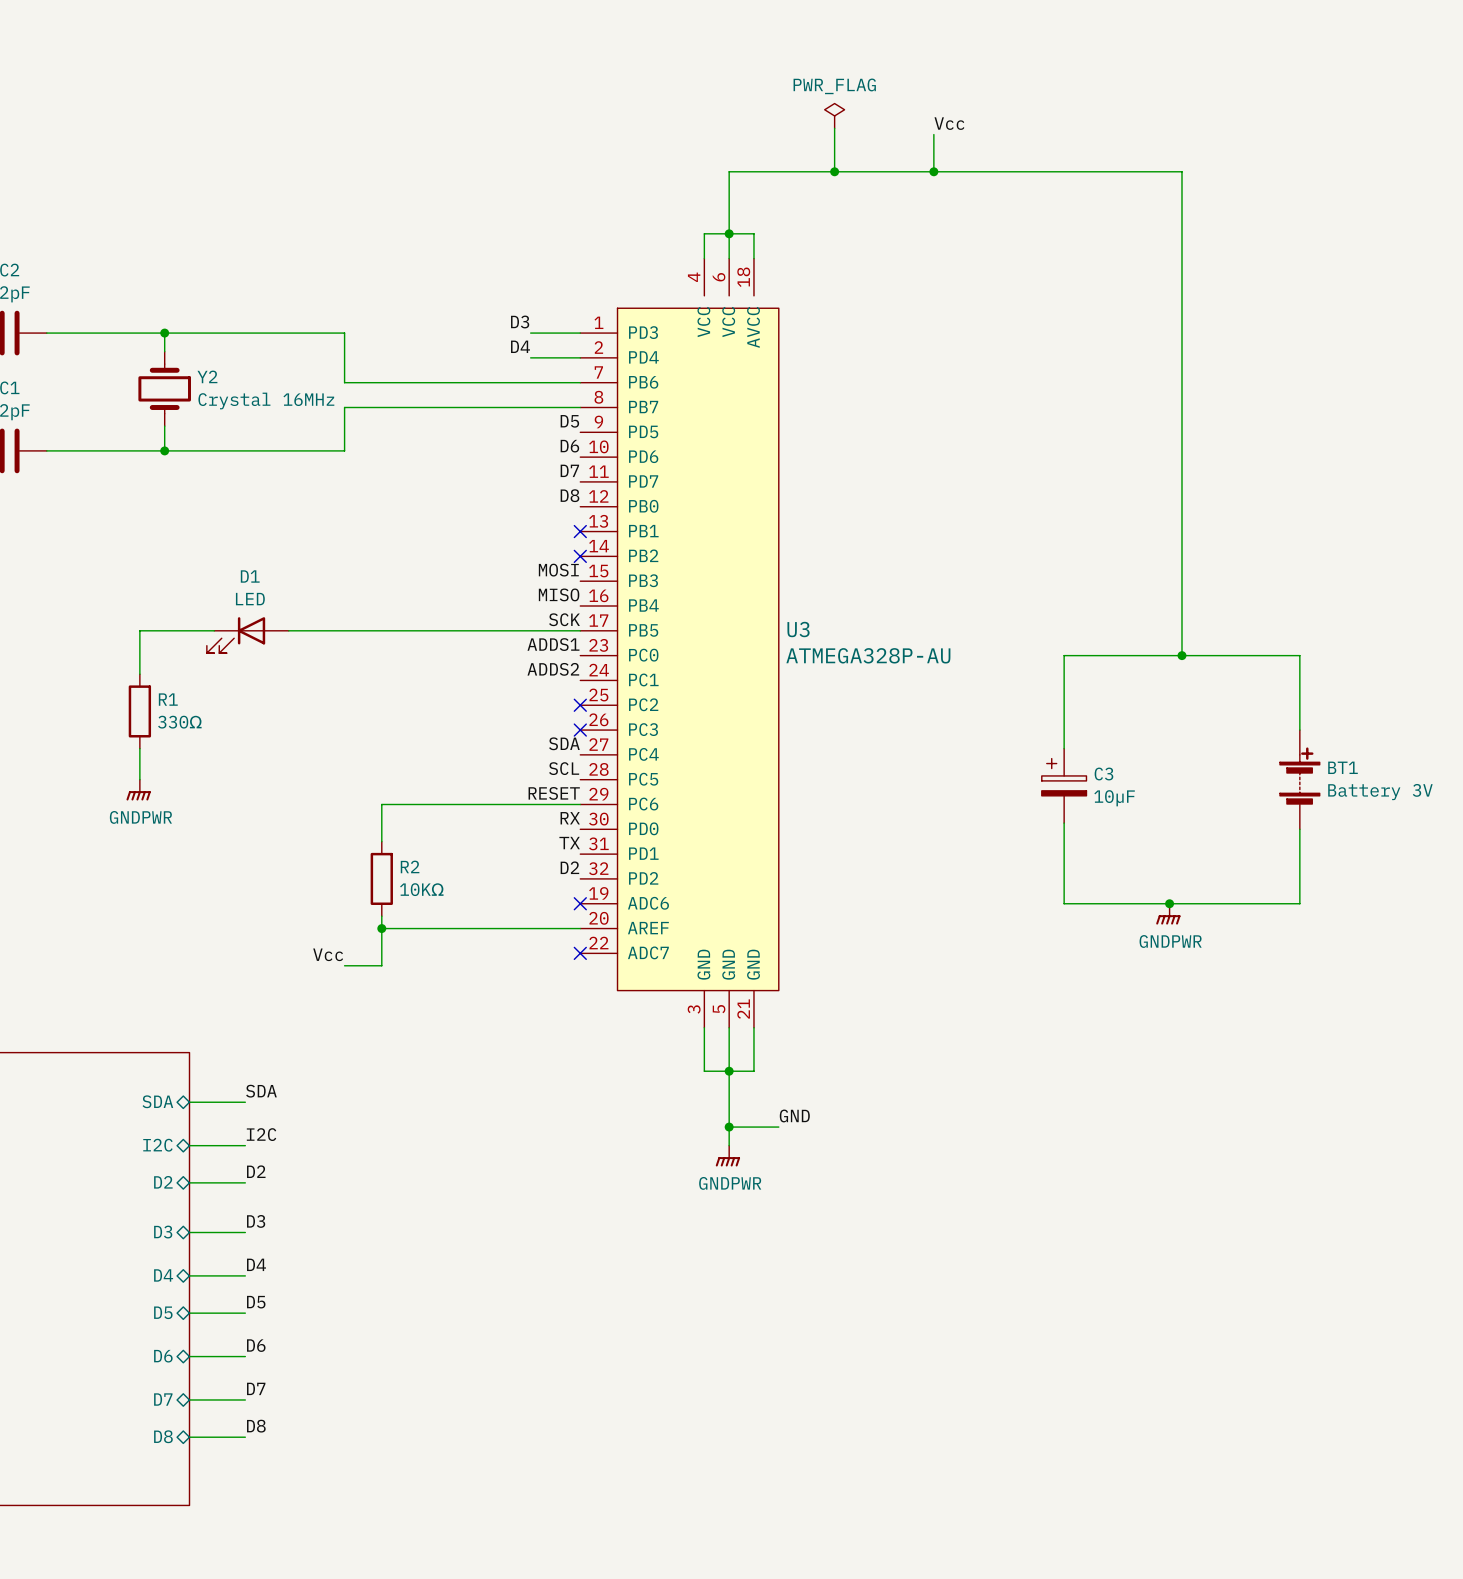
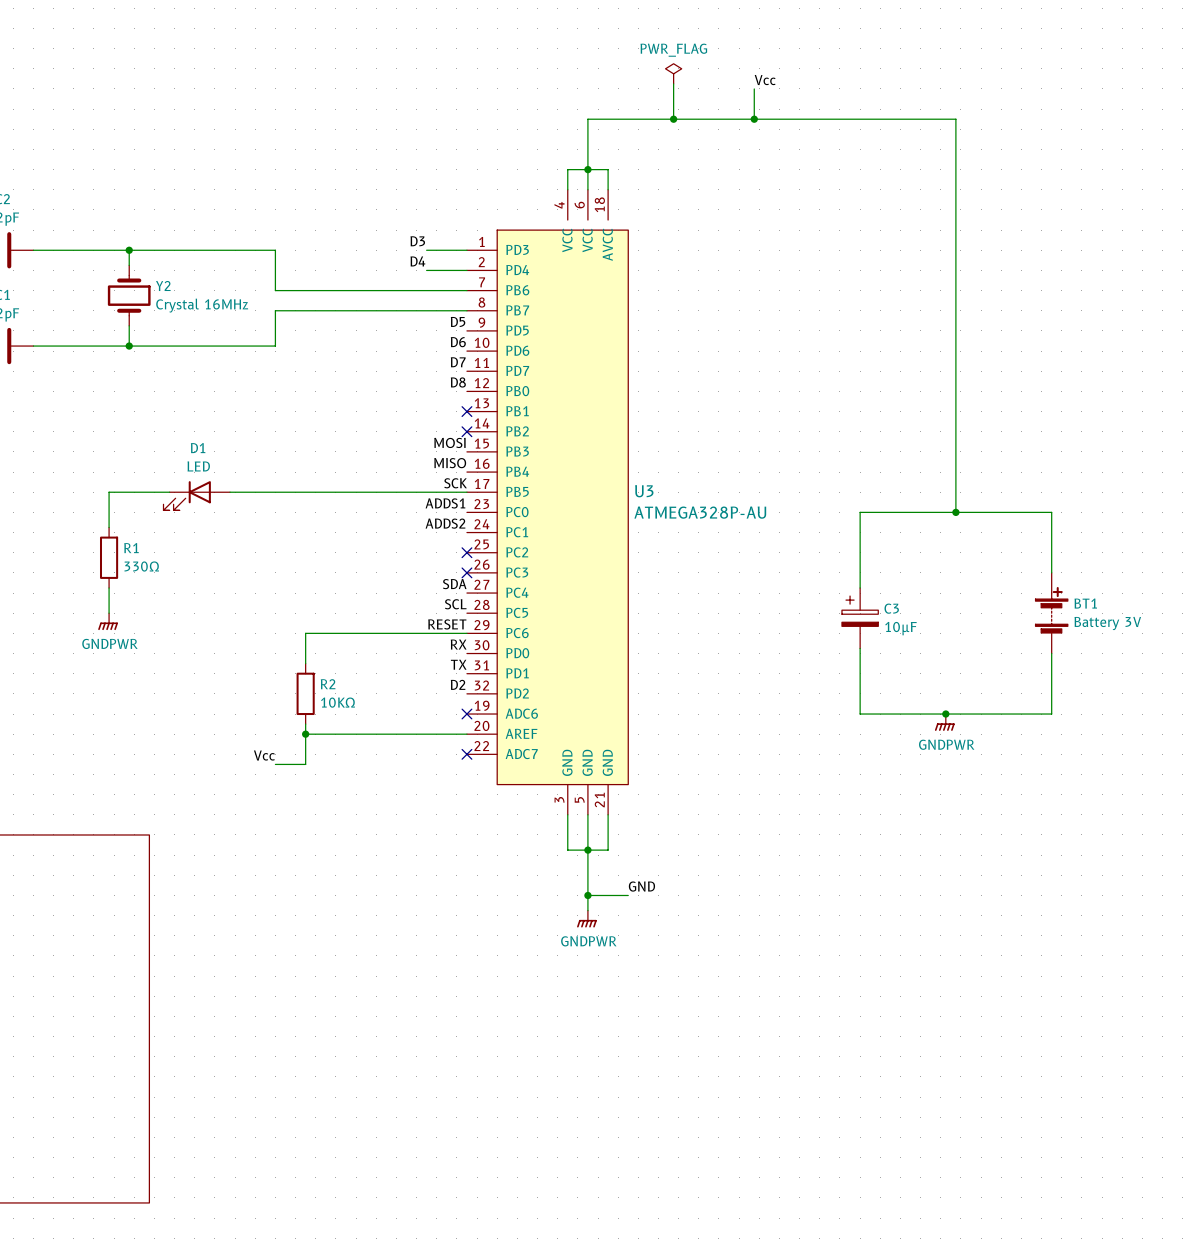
label: SDA (261, 1091) -> none
sheet pin: SDA (157, 1101) -> none
wire: (189, 1102) (245, 1102) -> none
label: I2C (261, 1134) -> none
sheet pin: I2C (157, 1145) -> none
wire: (189, 1145) (245, 1145) -> none
label: D2 (256, 1171) -> none
sheet pin: D2 (163, 1182) -> none
wire: (189, 1182) (245, 1182) -> none
label: D3 (256, 1221) -> none
sheet pin: D3 (163, 1232) -> none
wire: (189, 1232) (245, 1232) -> none
label: D4 (256, 1264) -> none
sheet pin: D4 (163, 1275) -> none
wire: (189, 1275) (245, 1275) -> none
label: D5 (256, 1302) -> none
sheet pin: D5 (163, 1312) -> none
wire: (189, 1313) (245, 1313) -> none
label: D6 (256, 1345) -> none
sheet pin: D6 (163, 1356) -> none
wire: (189, 1356) (245, 1356) -> none
label: D7 (256, 1388) -> none
sheet pin: D7 (163, 1399) -> none
wire: (189, 1399) (245, 1399) -> none
label: D8 (256, 1426) -> none
sheet pin: D8 (163, 1436) -> none
wire: (189, 1437) (245, 1437) -> none

